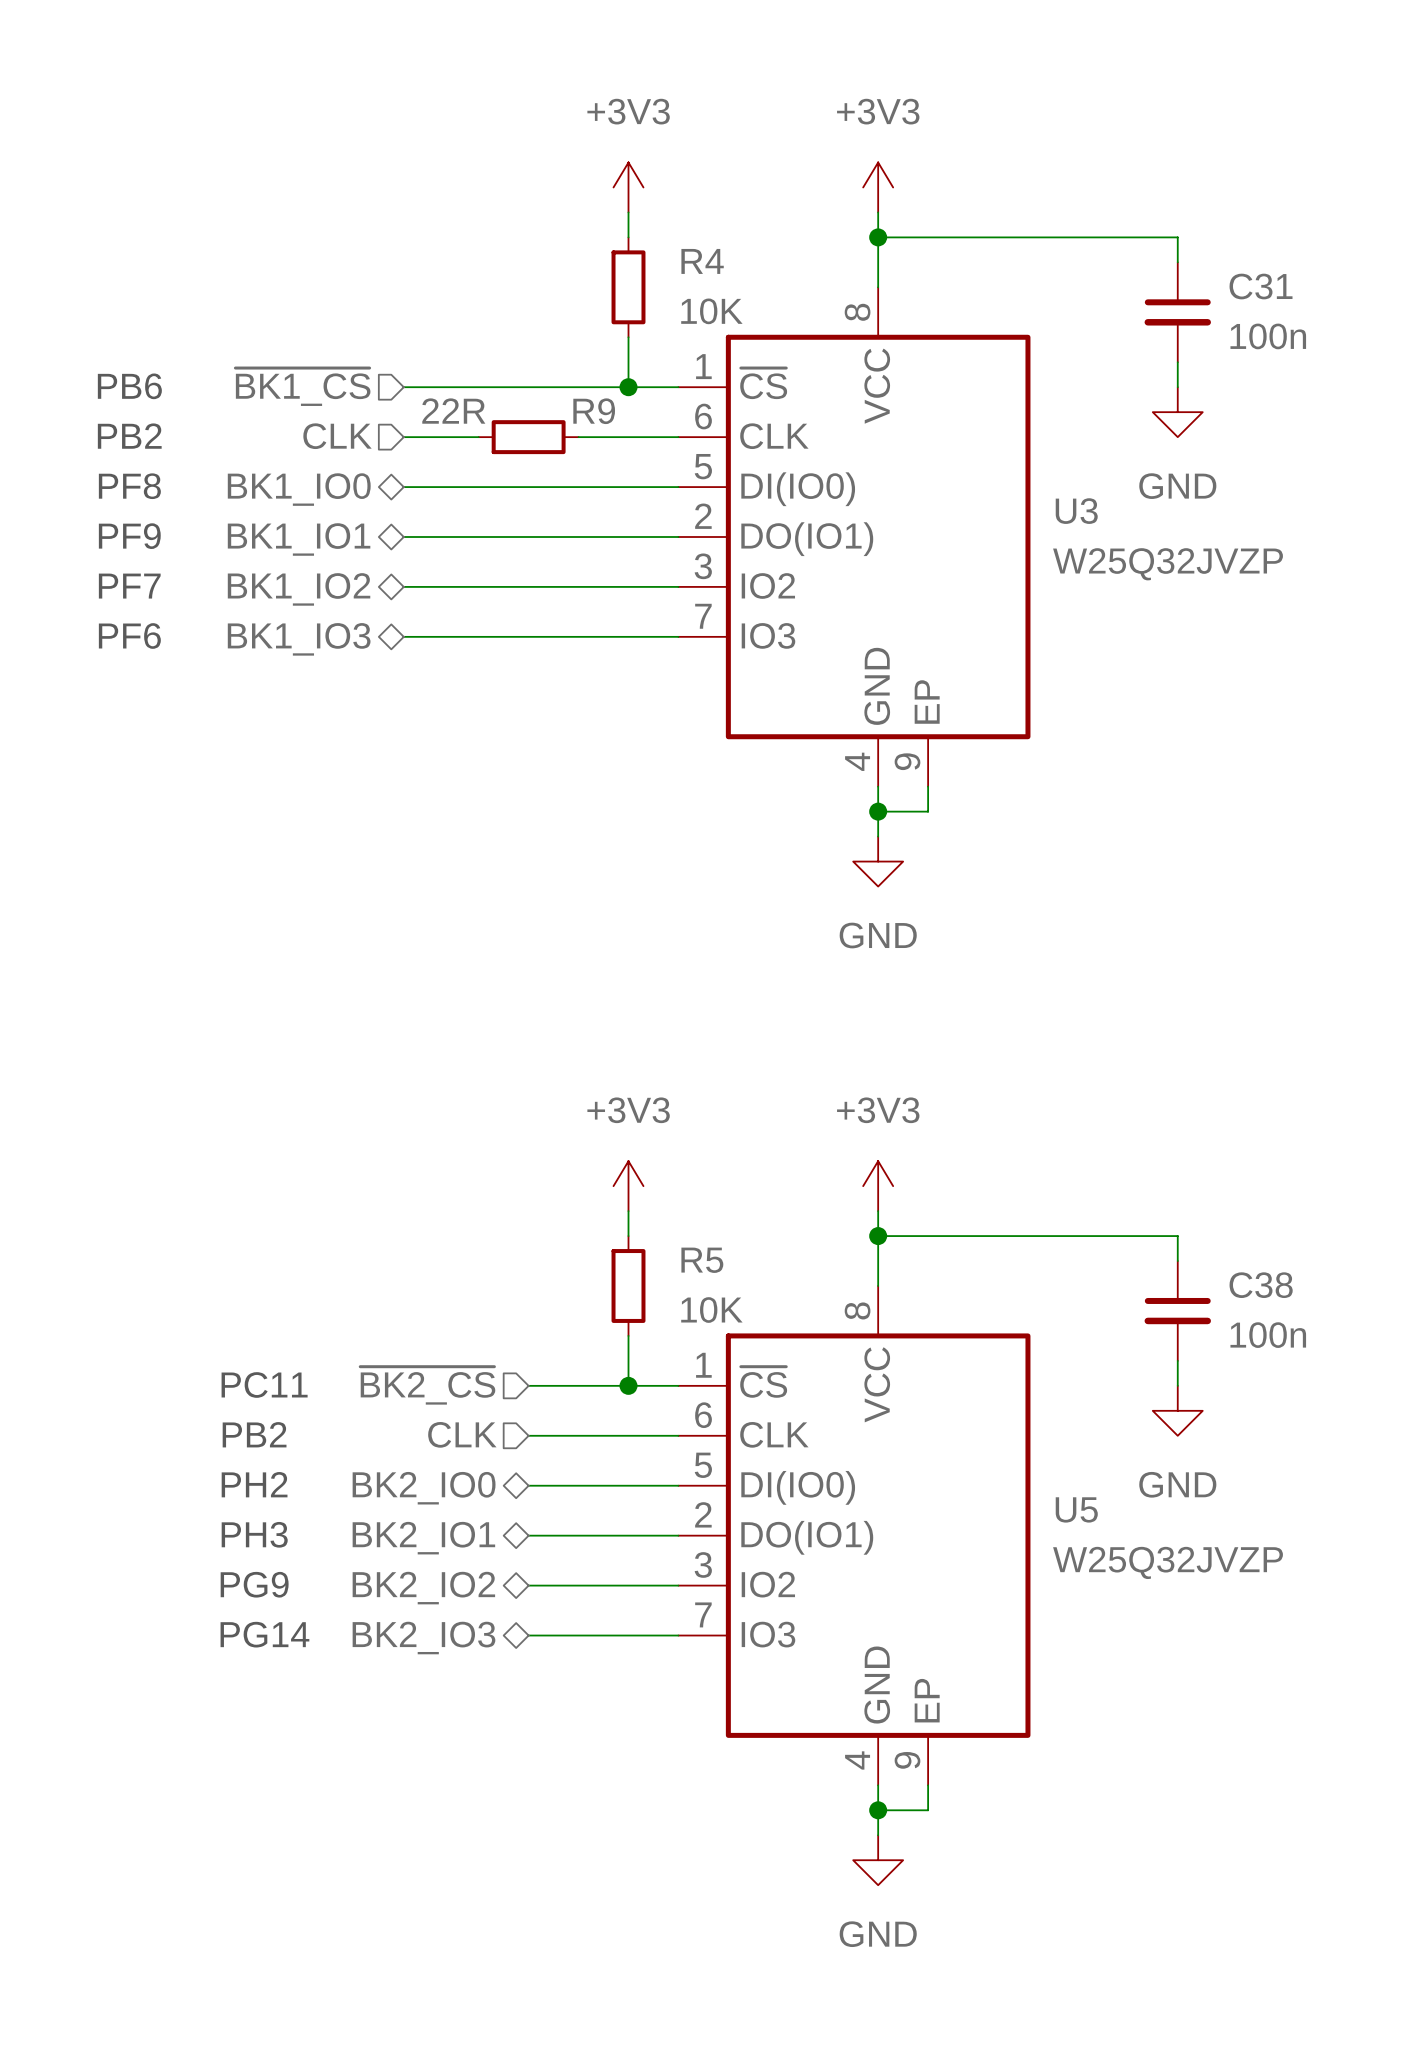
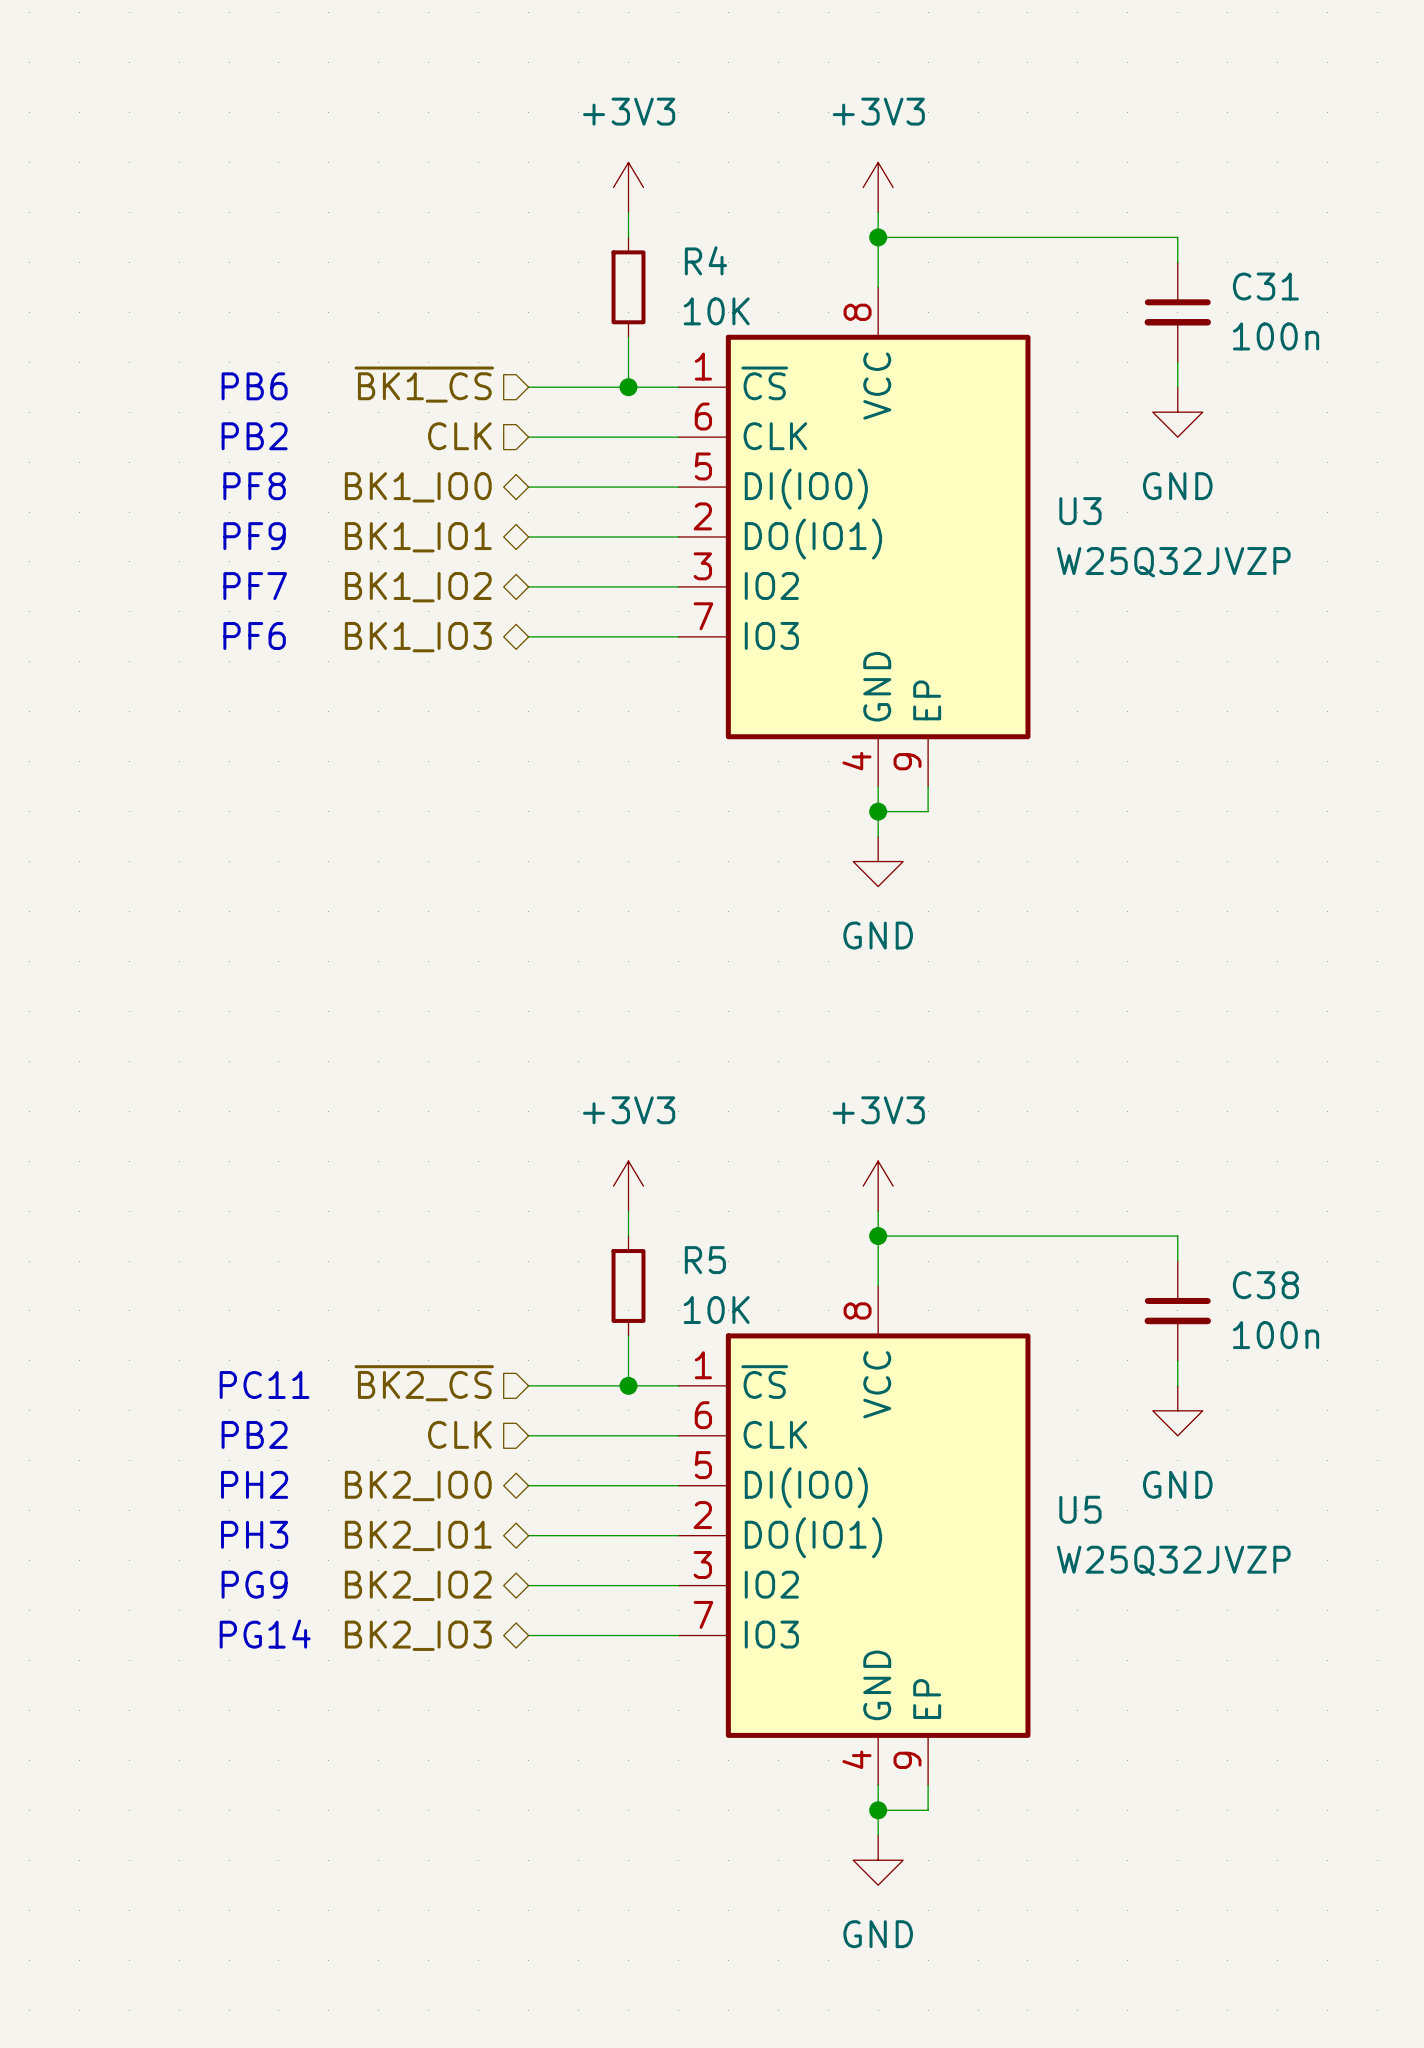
text position: PB6 (129, 386) -> PB6 (254, 386)
hierarchical label position: ~{BK1_CS} (302, 387) -> ~{BK1_CS} (424, 384)
wire: (403, 387) (528, 387) -> none
text position: PB2 (129, 436) -> PB2 (254, 436)
hierarchical label position: CLK (337, 436) -> CLK (459, 436)
wire: (403, 437) (478, 437) -> none
wire: none -> (528, 437) (578, 437)
R9: 22R (528, 437) -> none
text position: PF8 (129, 486) -> PF8 (254, 486)
wire: (403, 487) (528, 487) -> none
hierarchical label position: BK1_IO0 (299, 489) -> BK1_IO0 (418, 487)
text position: PF9 (129, 536) -> PF9 (254, 536)
wire: (403, 537) (528, 537) -> none
hierarchical label position: BK1_IO1 (299, 539) -> BK1_IO1 (418, 537)
text position: PF7 (129, 586) -> PF7 (255, 586)
wire: (403, 586) (528, 586) -> none
hierarchical label position: BK1_IO2 (299, 589) -> BK1_IO2 (418, 587)
text position: PF6 (129, 636) -> PF6 (254, 636)
wire: (403, 636) (528, 636) -> none
hierarchical label position: BK1_IO3 (299, 639) -> BK1_IO3 (418, 637)

